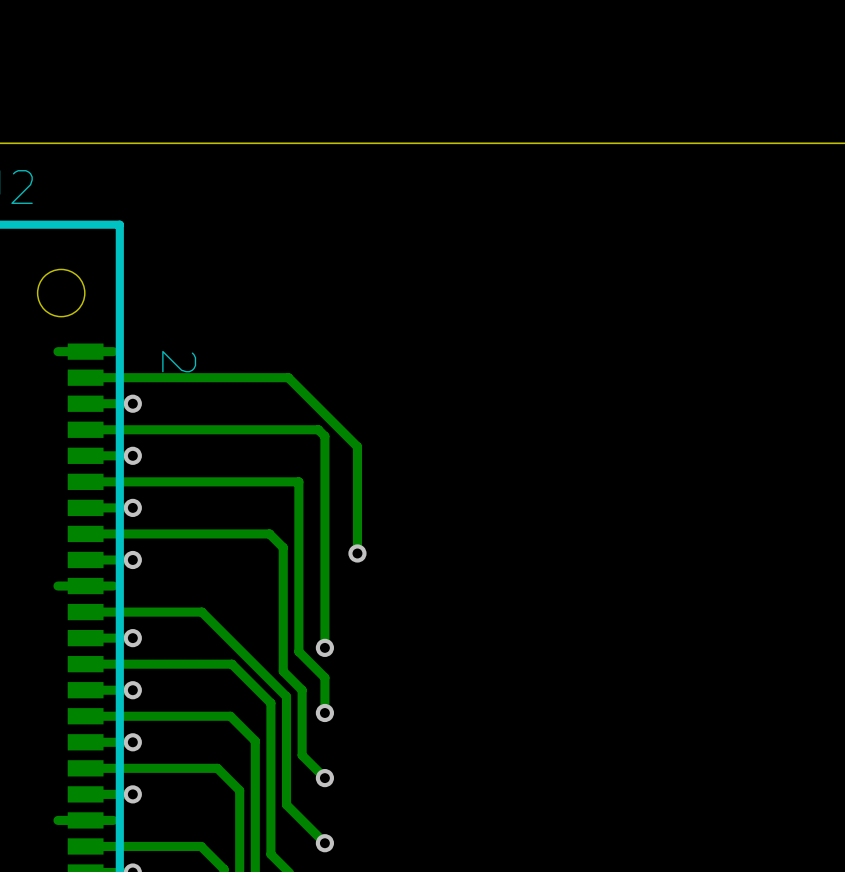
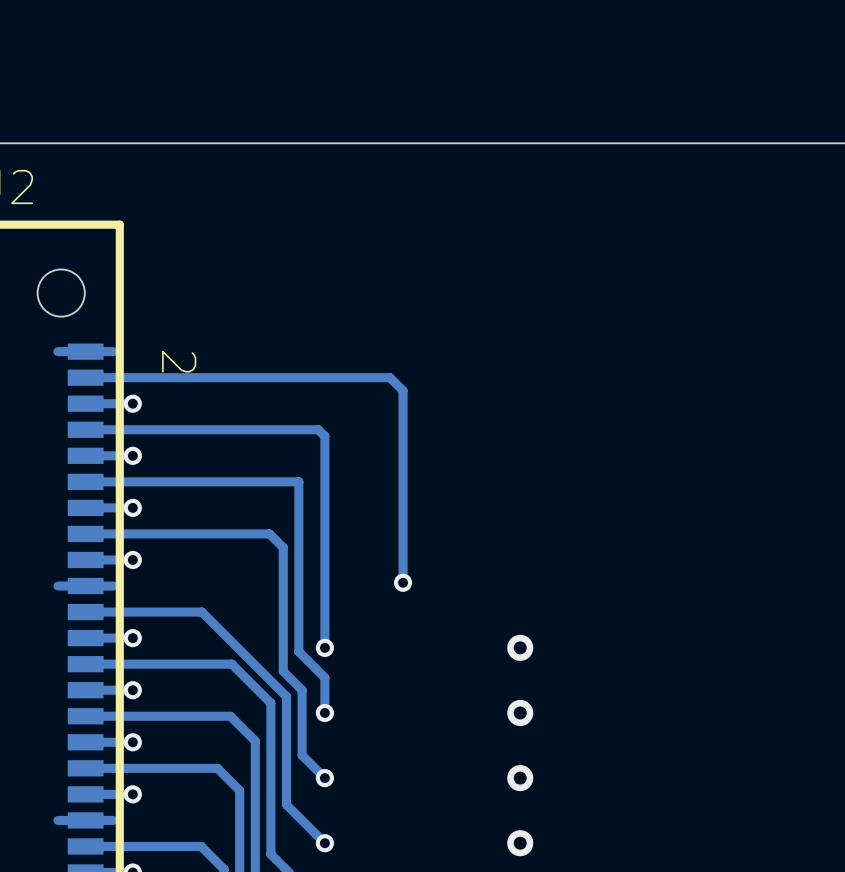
track: (288, 377) (357, 446) (357, 553) -> (288, 377) (390, 377) (403, 390) (403, 582)
via position: (357, 553) -> (403, 582)
via: none -> (520, 647)
via: none -> (520, 712)
via: none -> (520, 778)
via: none -> (520, 843)

